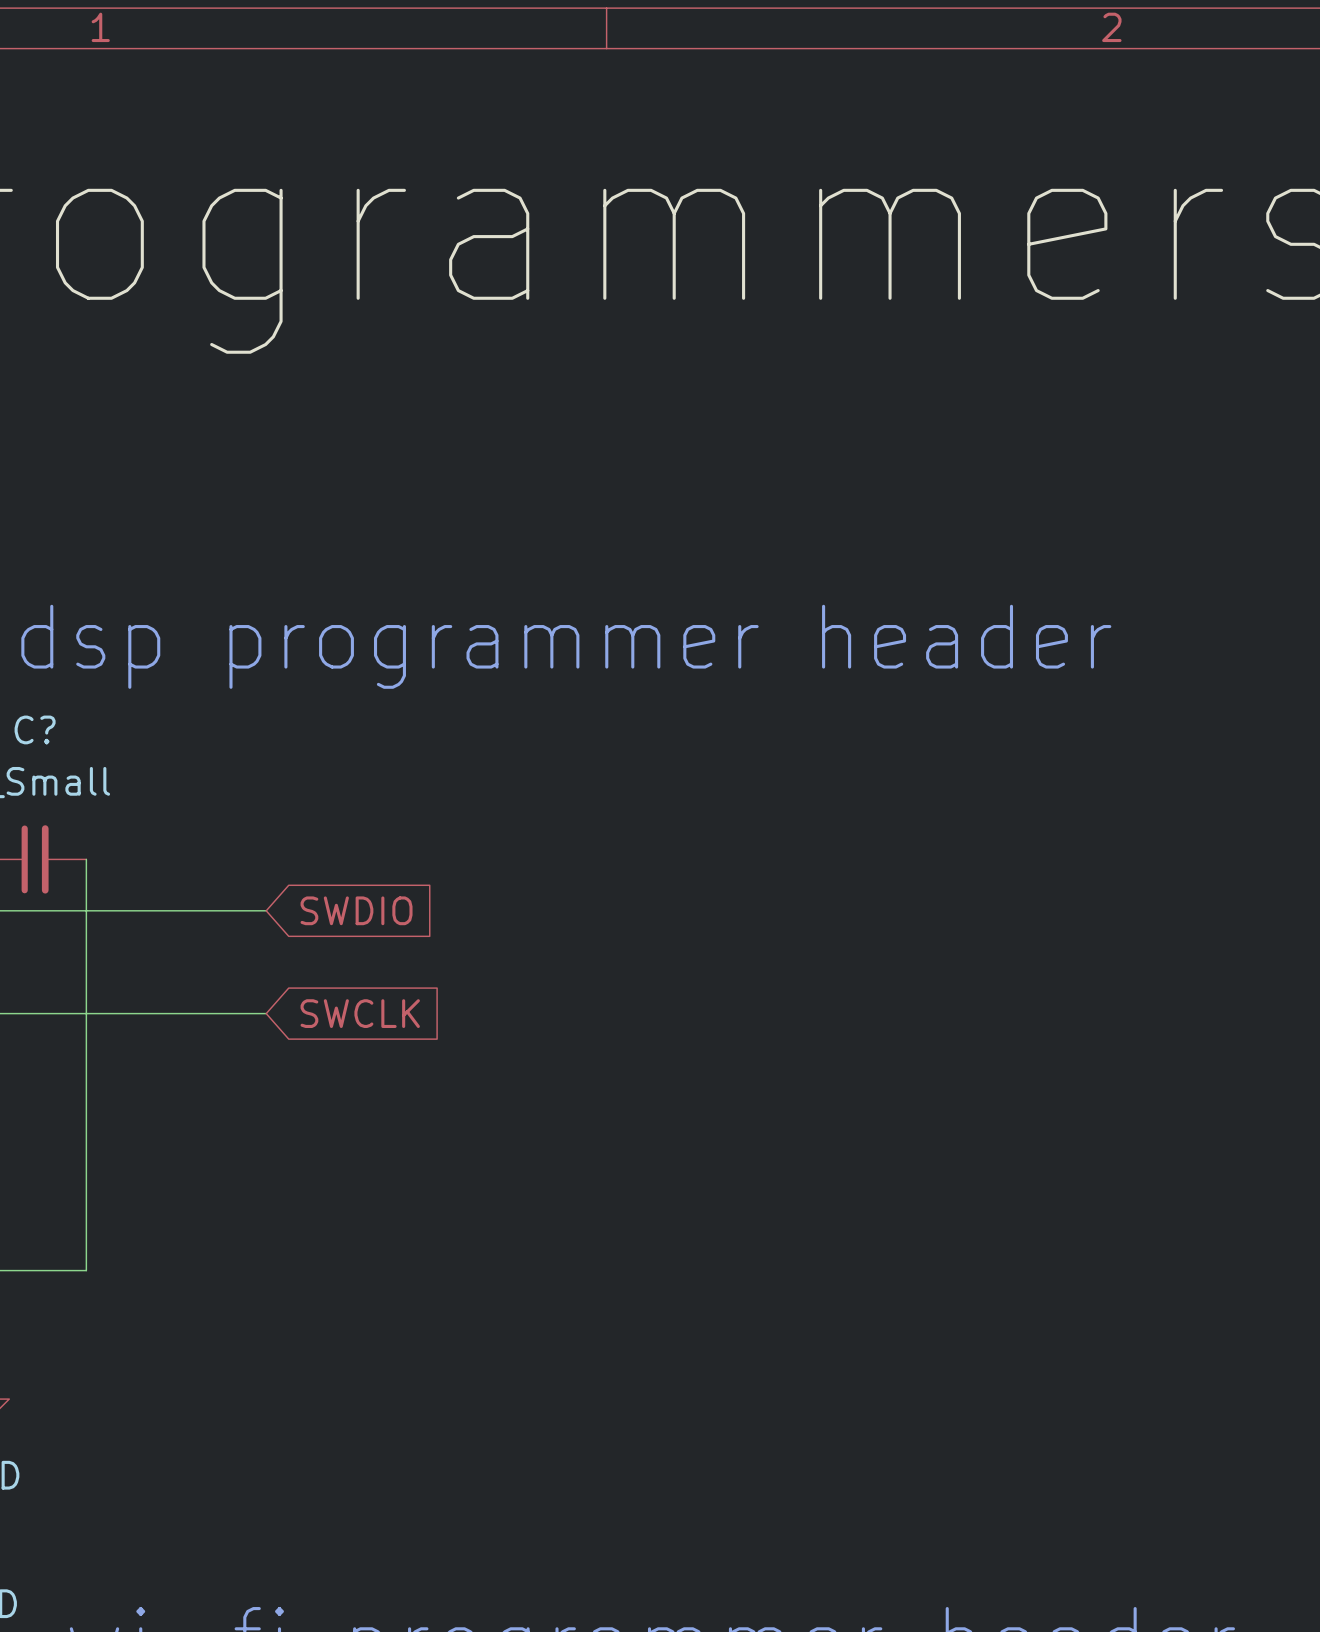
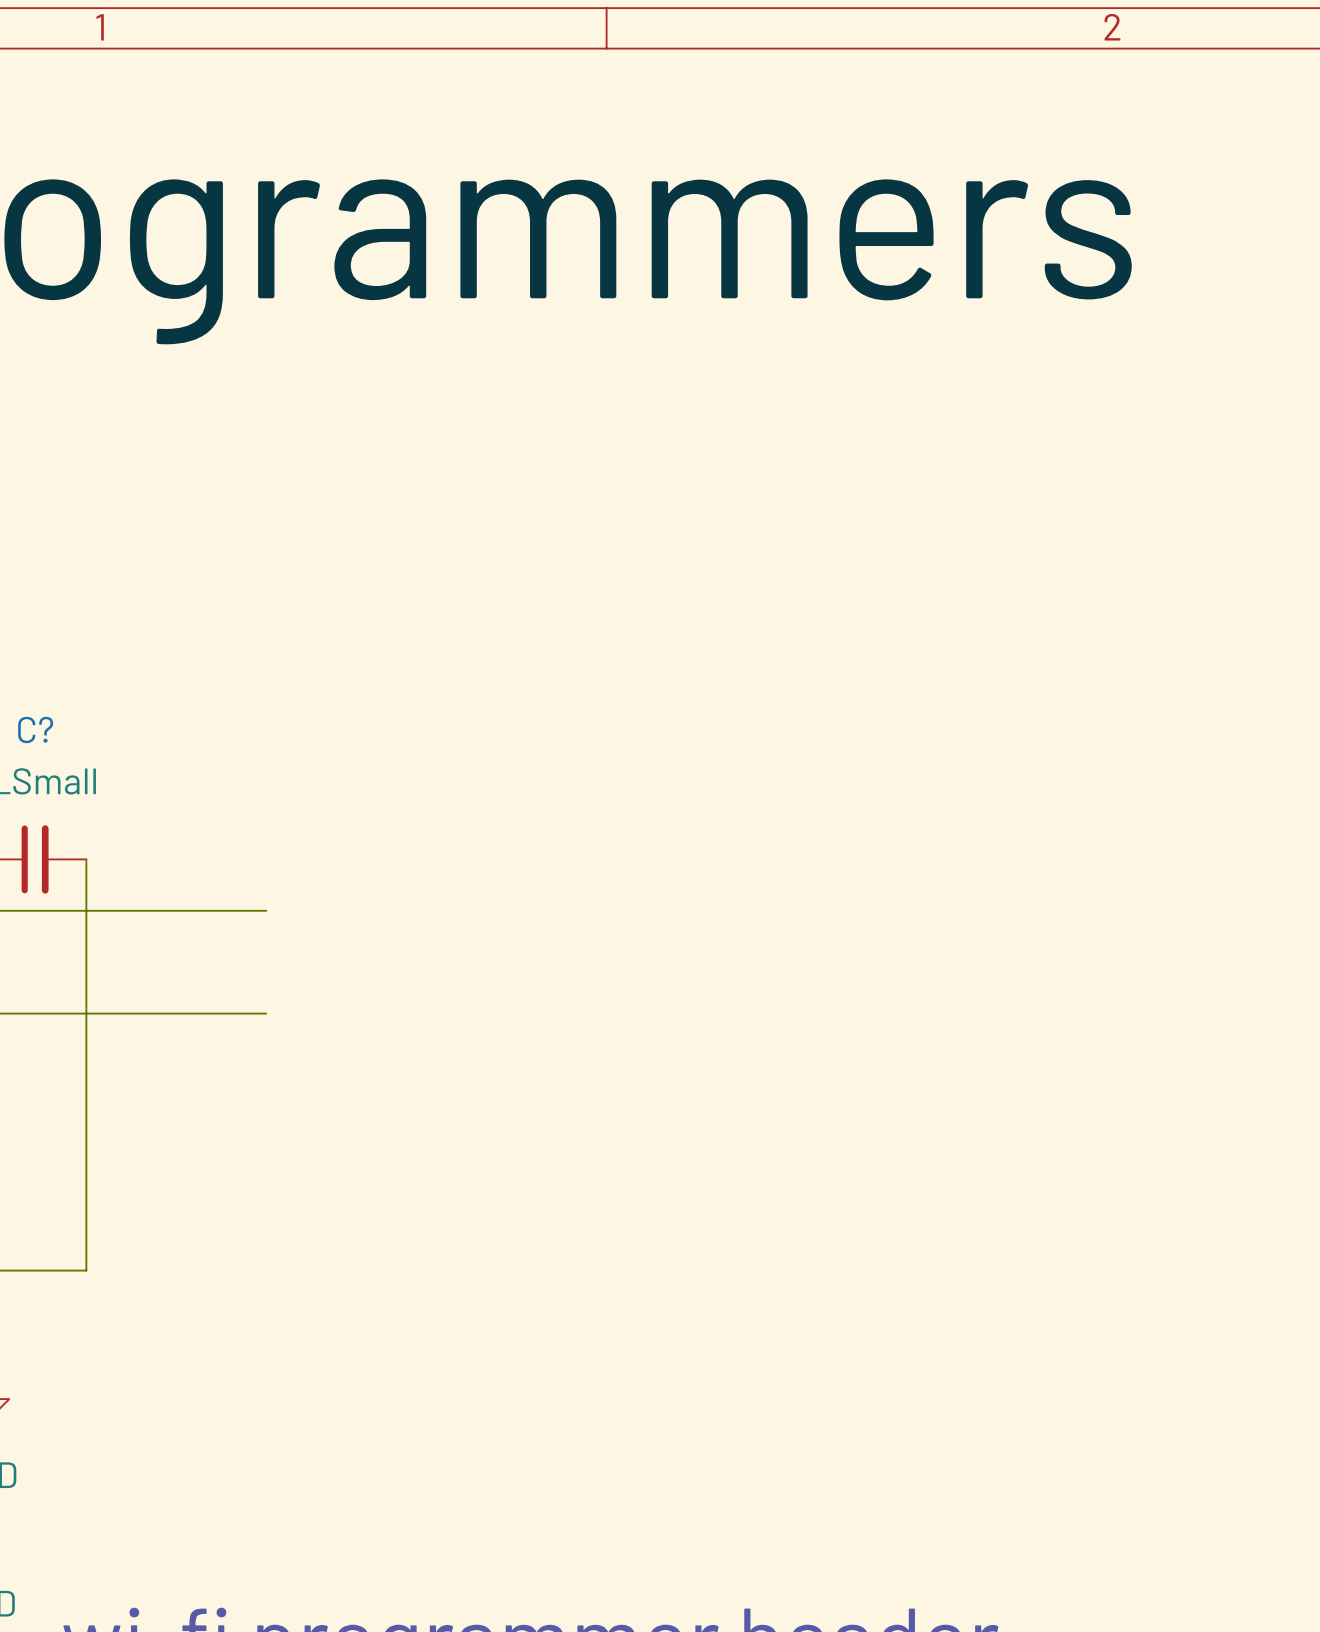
text: dsp programmer header (566, 646) -> none
global label: SWDIO (356, 910) -> none
global label: SWCLK (360, 1013) -> none

